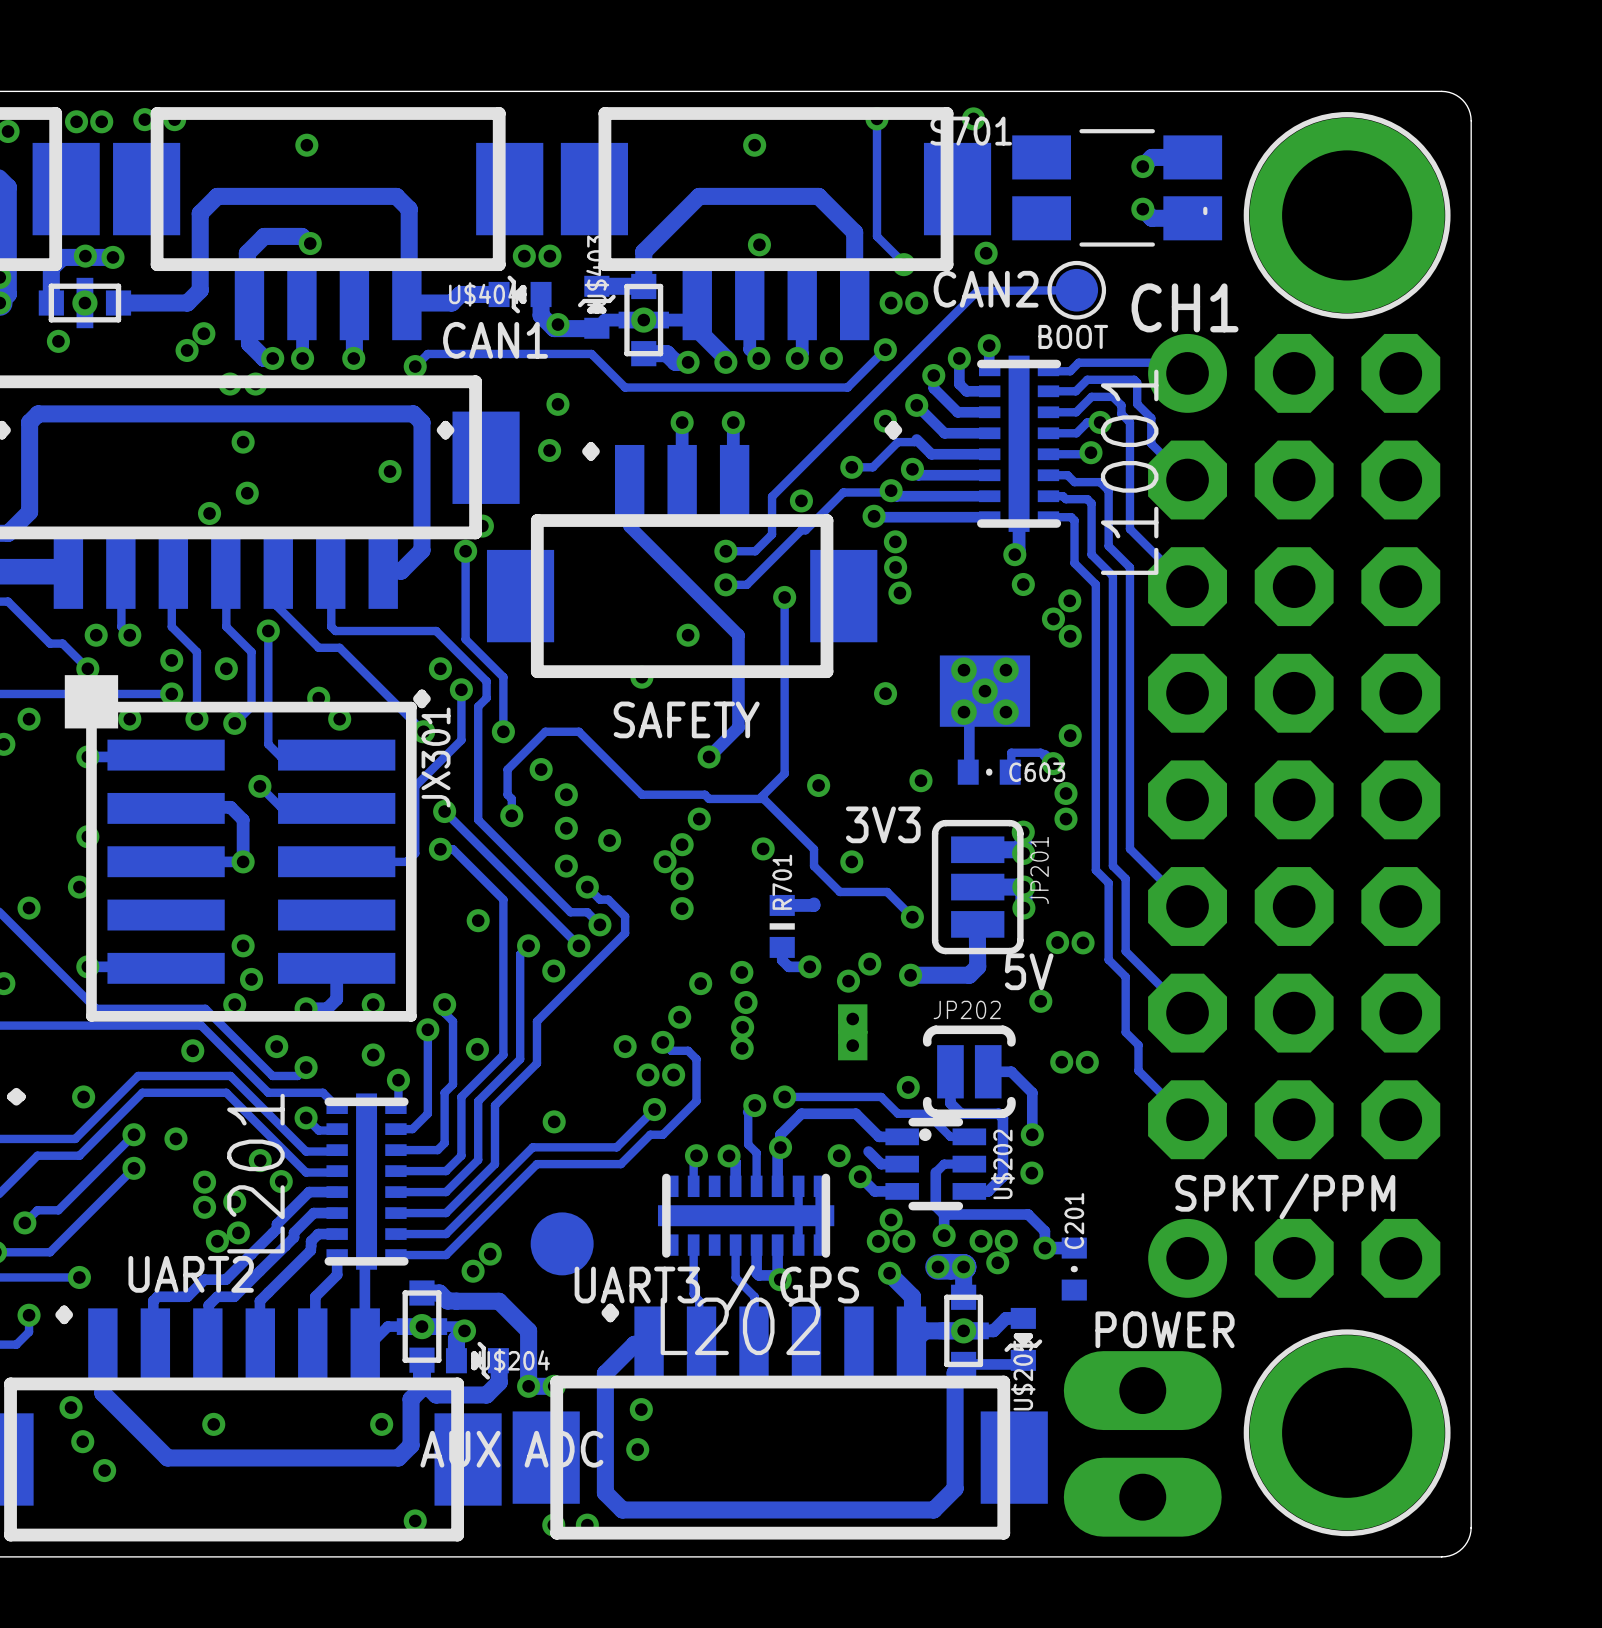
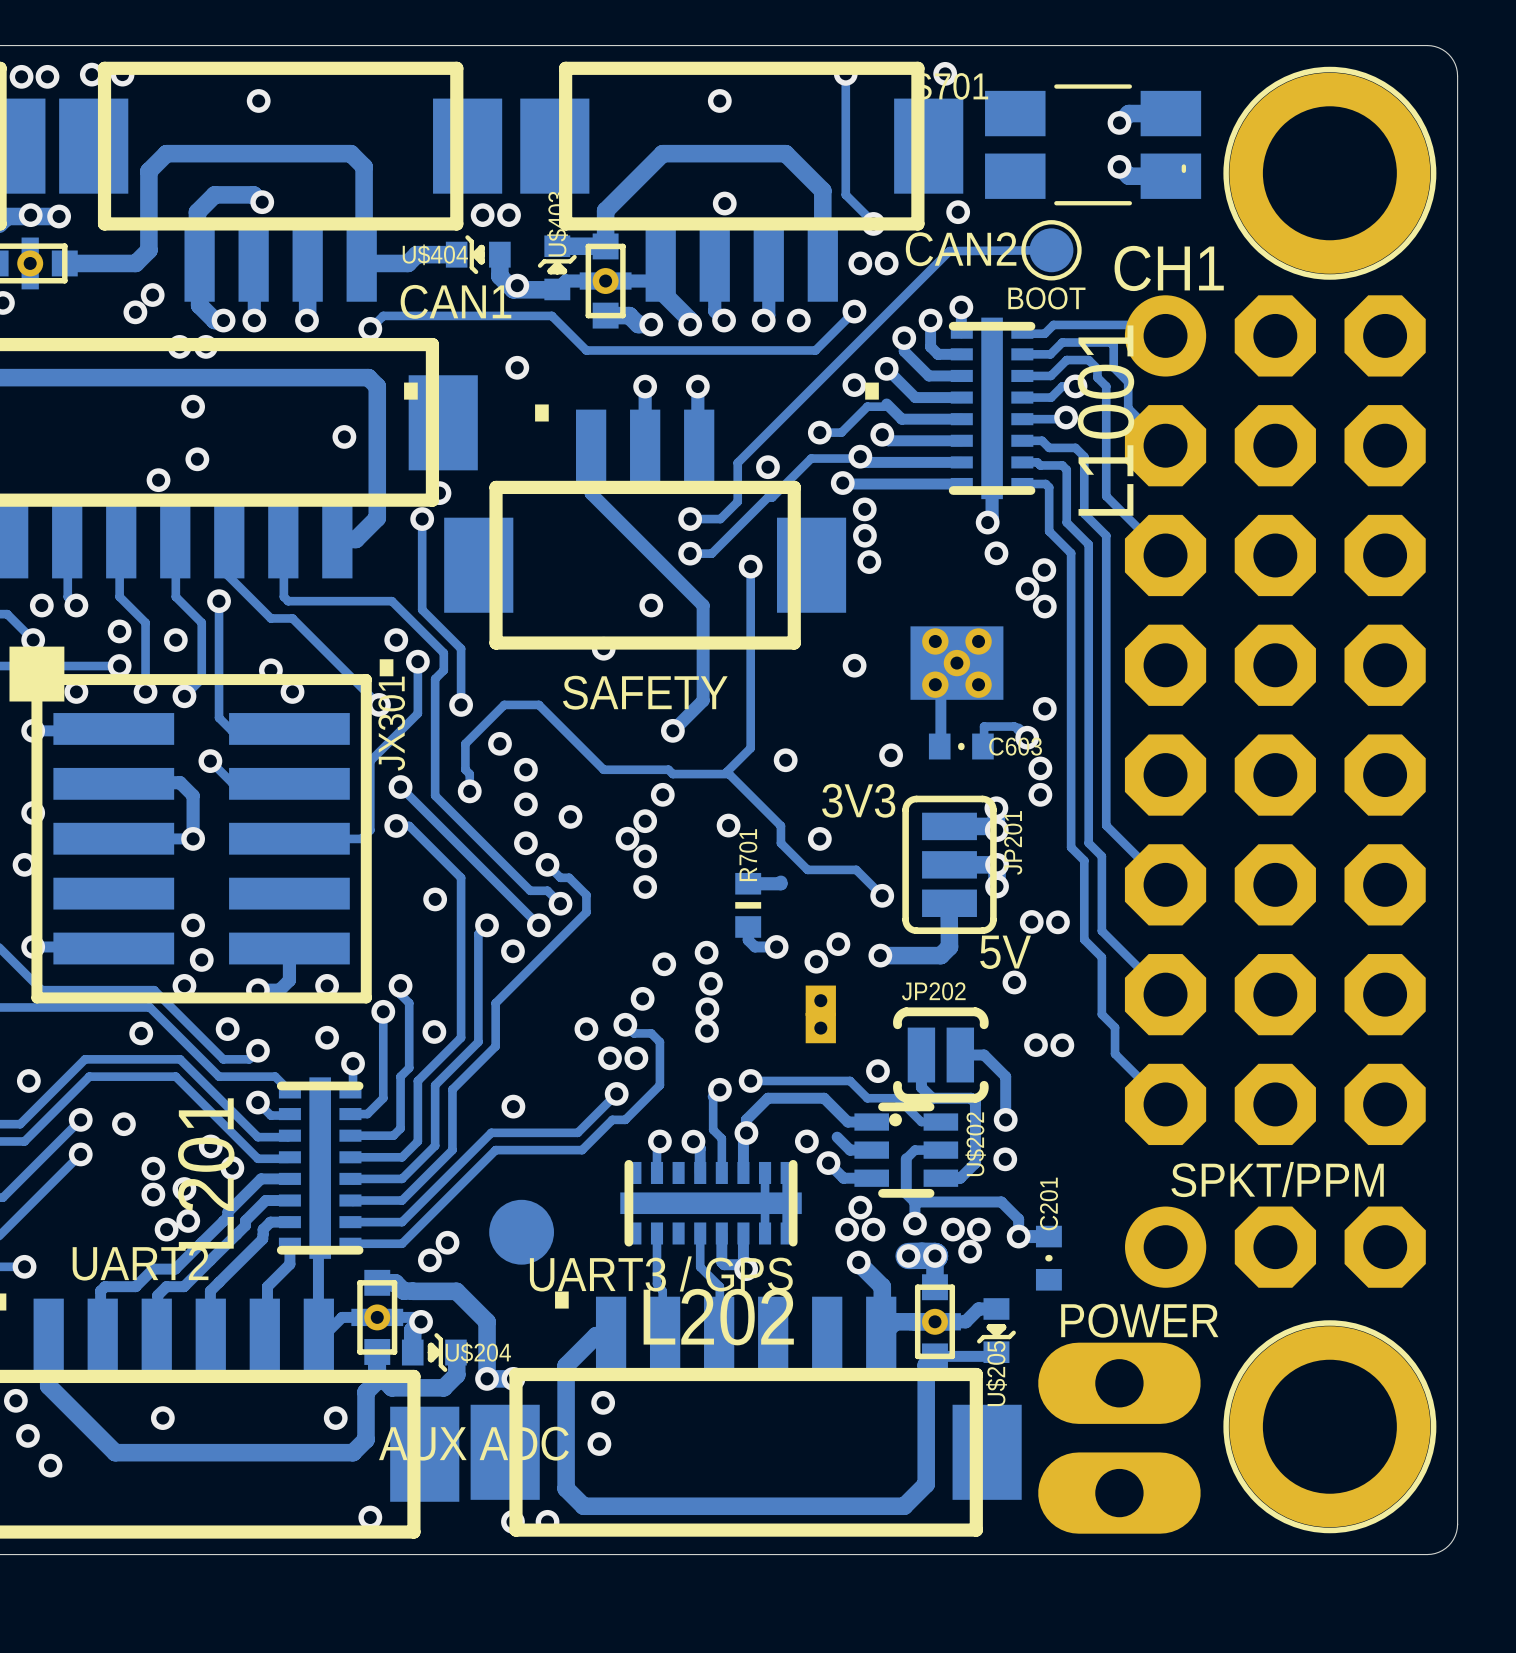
via: (549, 450) -> none

